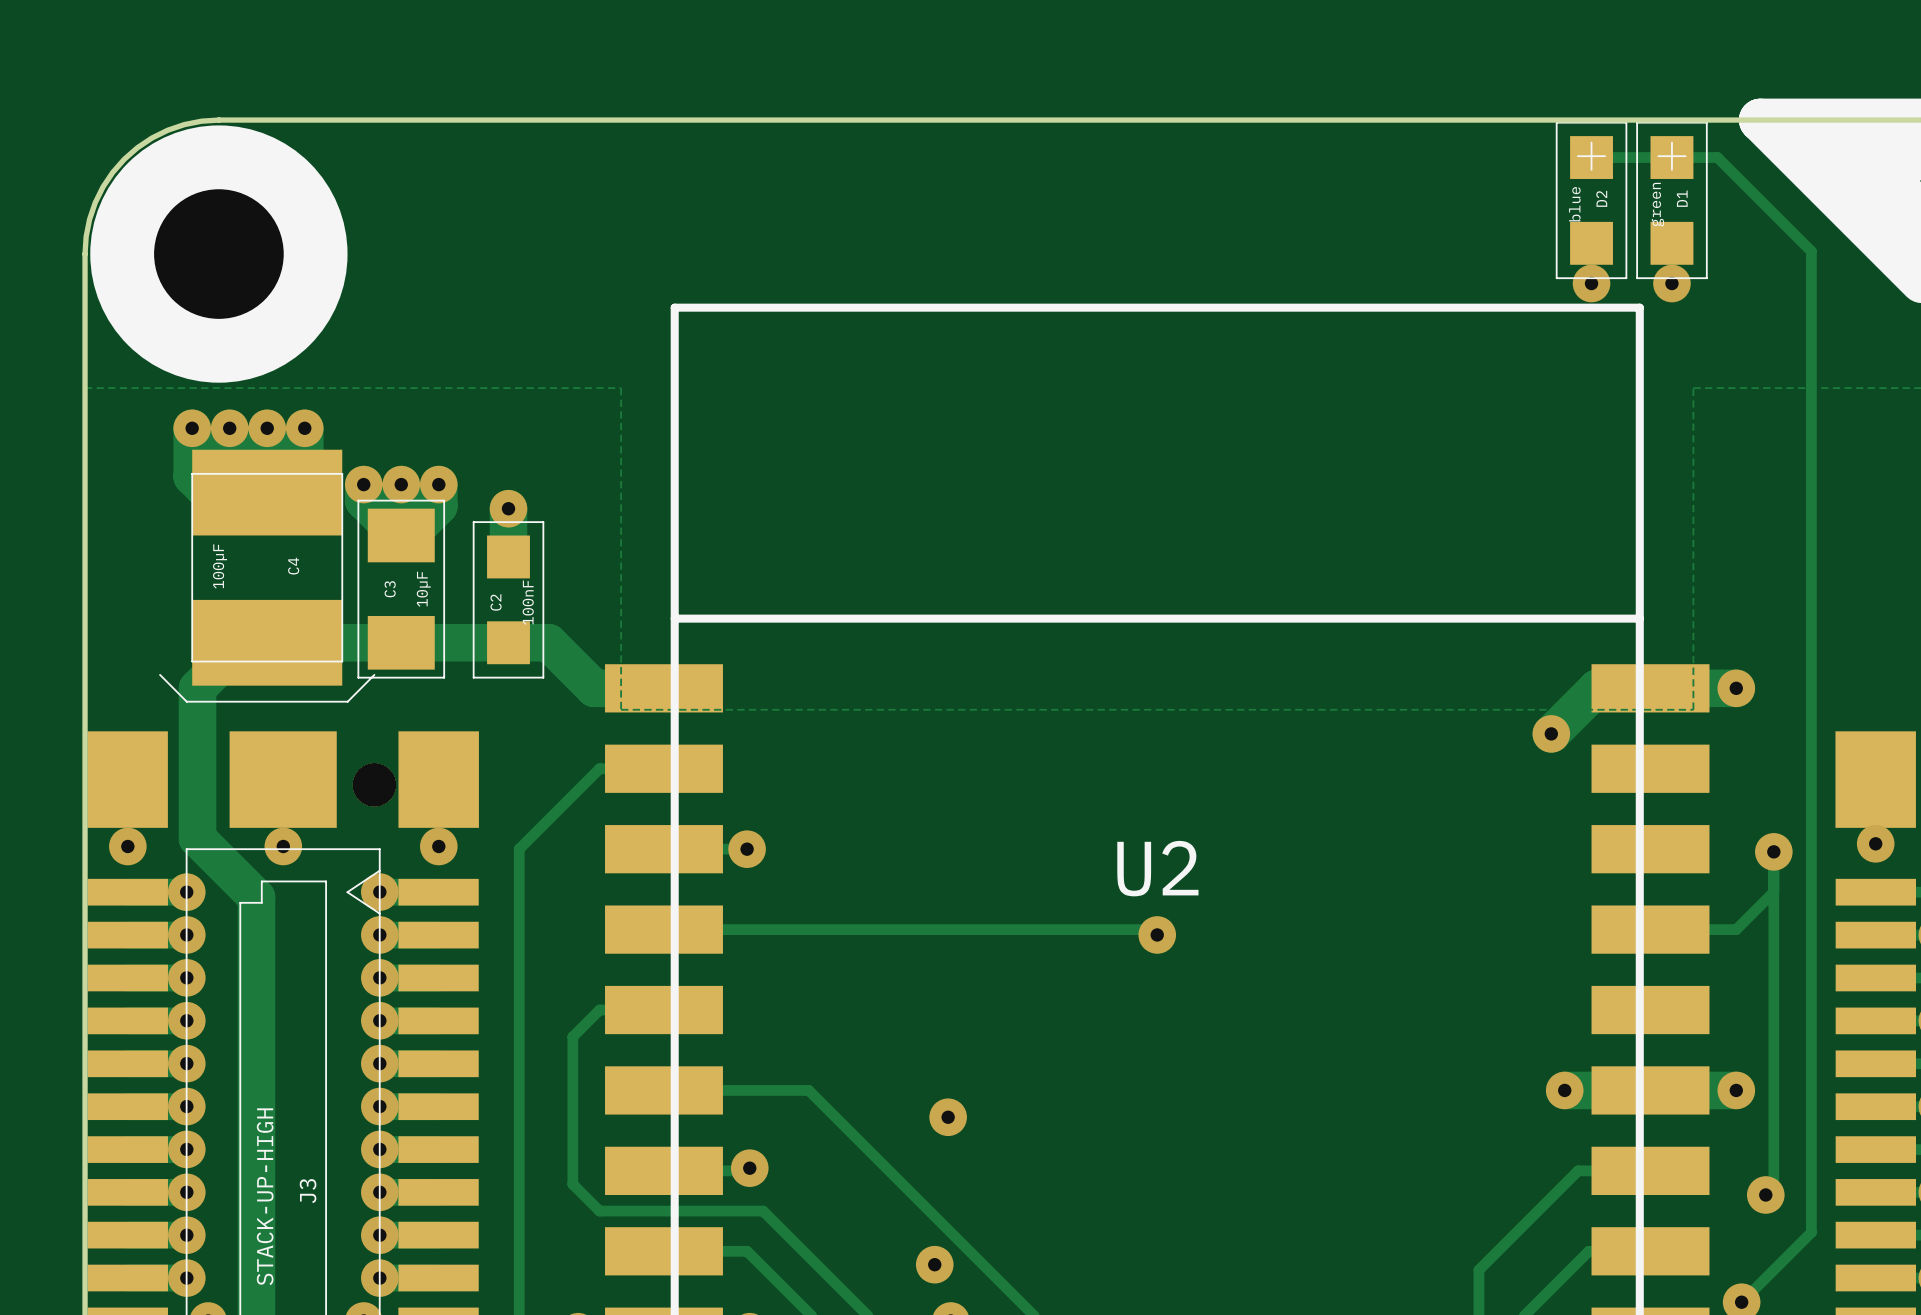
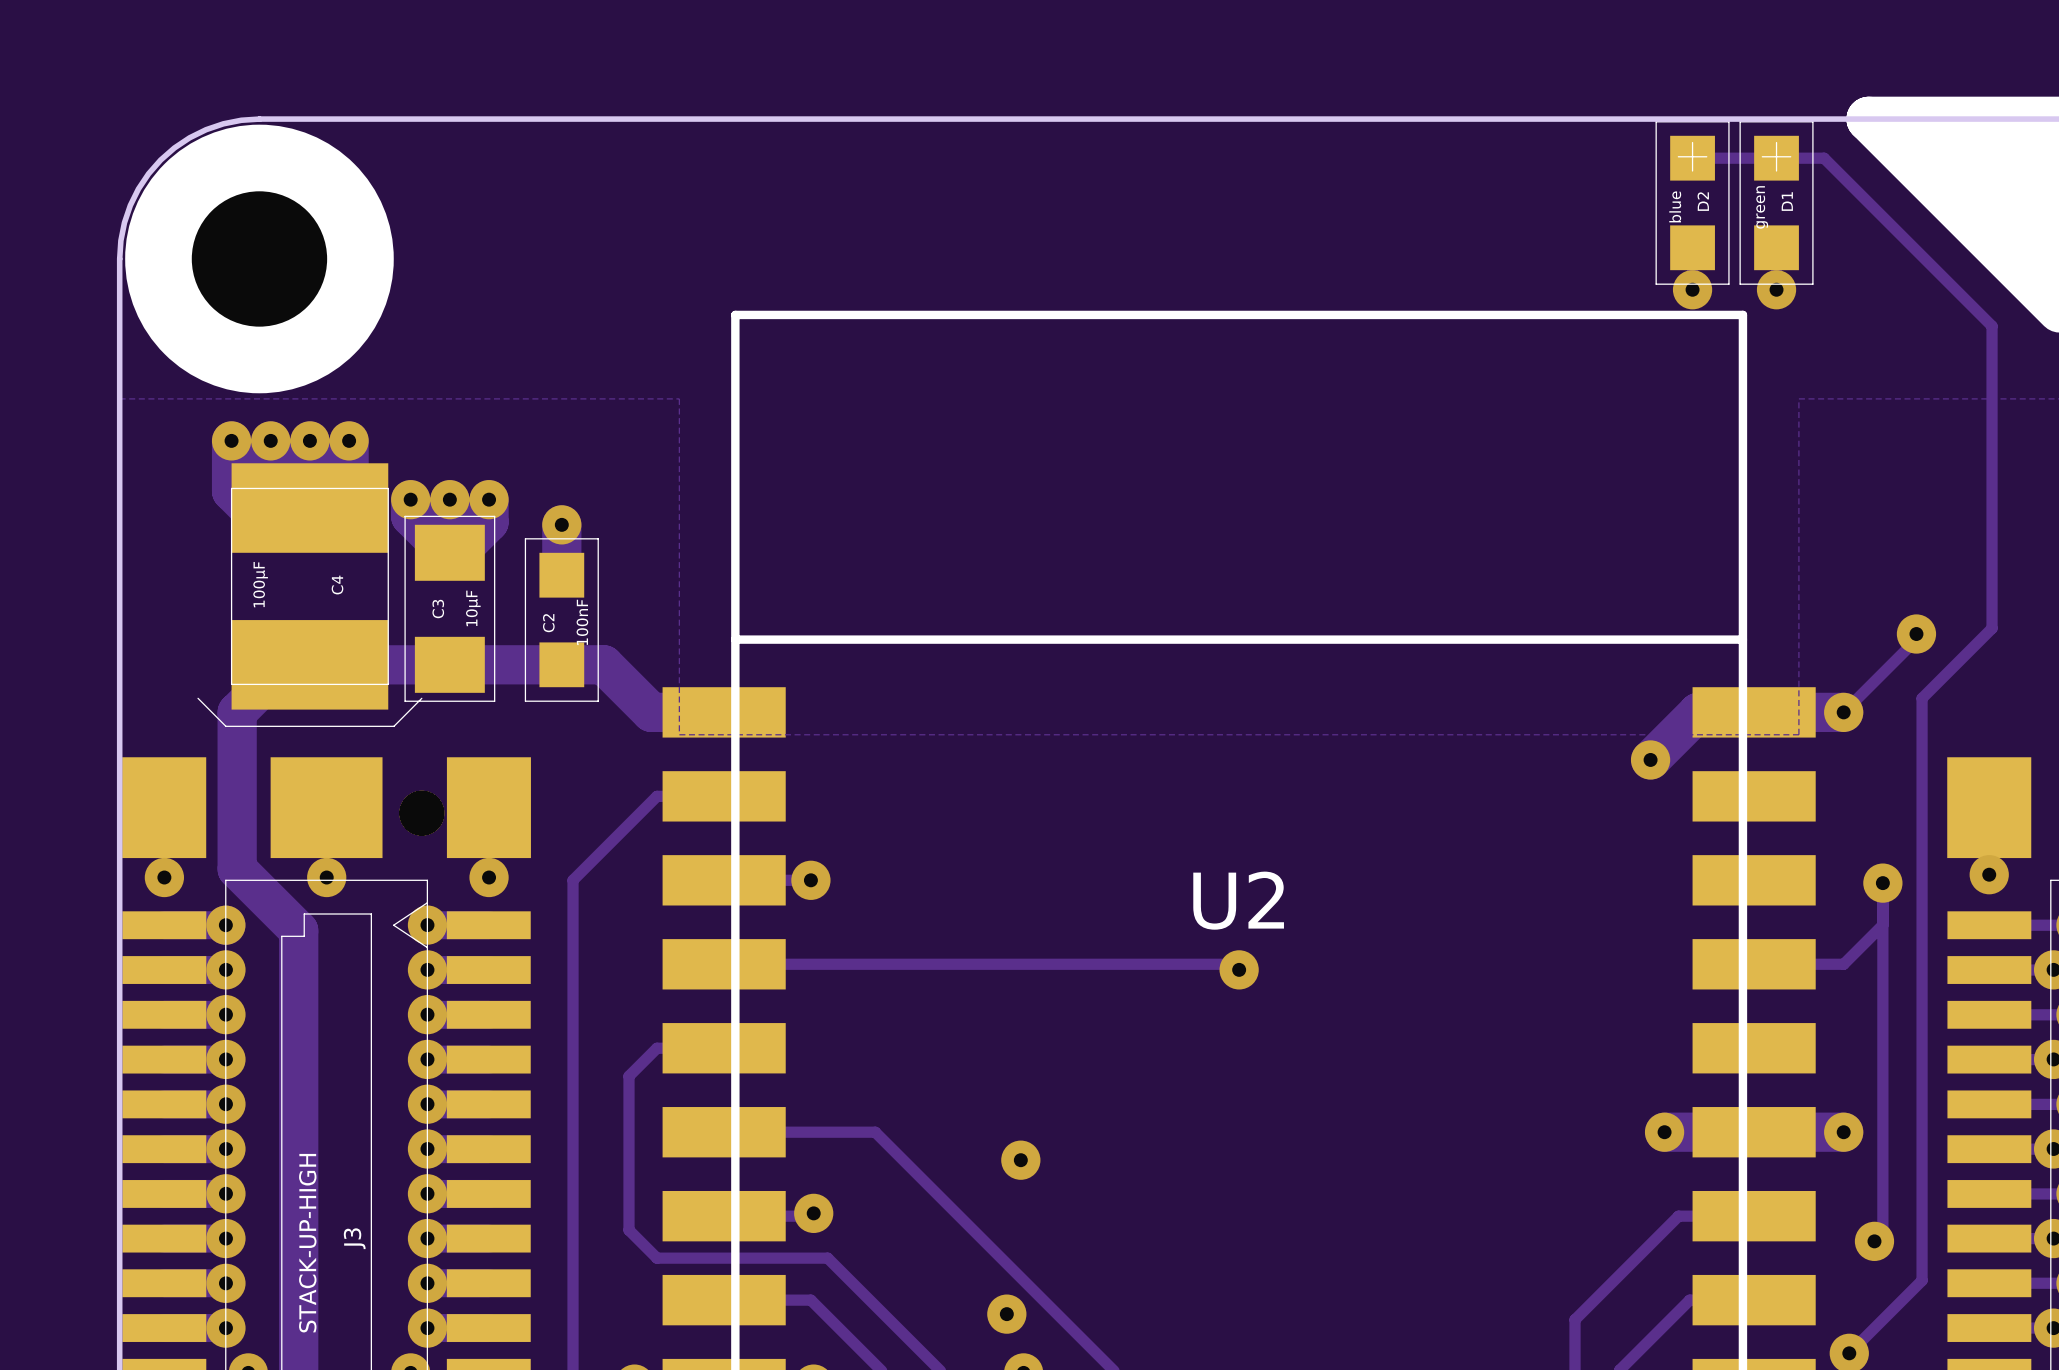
track: (1811, 251) (1811, 674) -> (1922, 256) (1992, 326) (1992, 628) (1922, 698)
track: none -> (1916, 634) (1916, 639) (1843, 712)
via: none -> (1916, 634)

